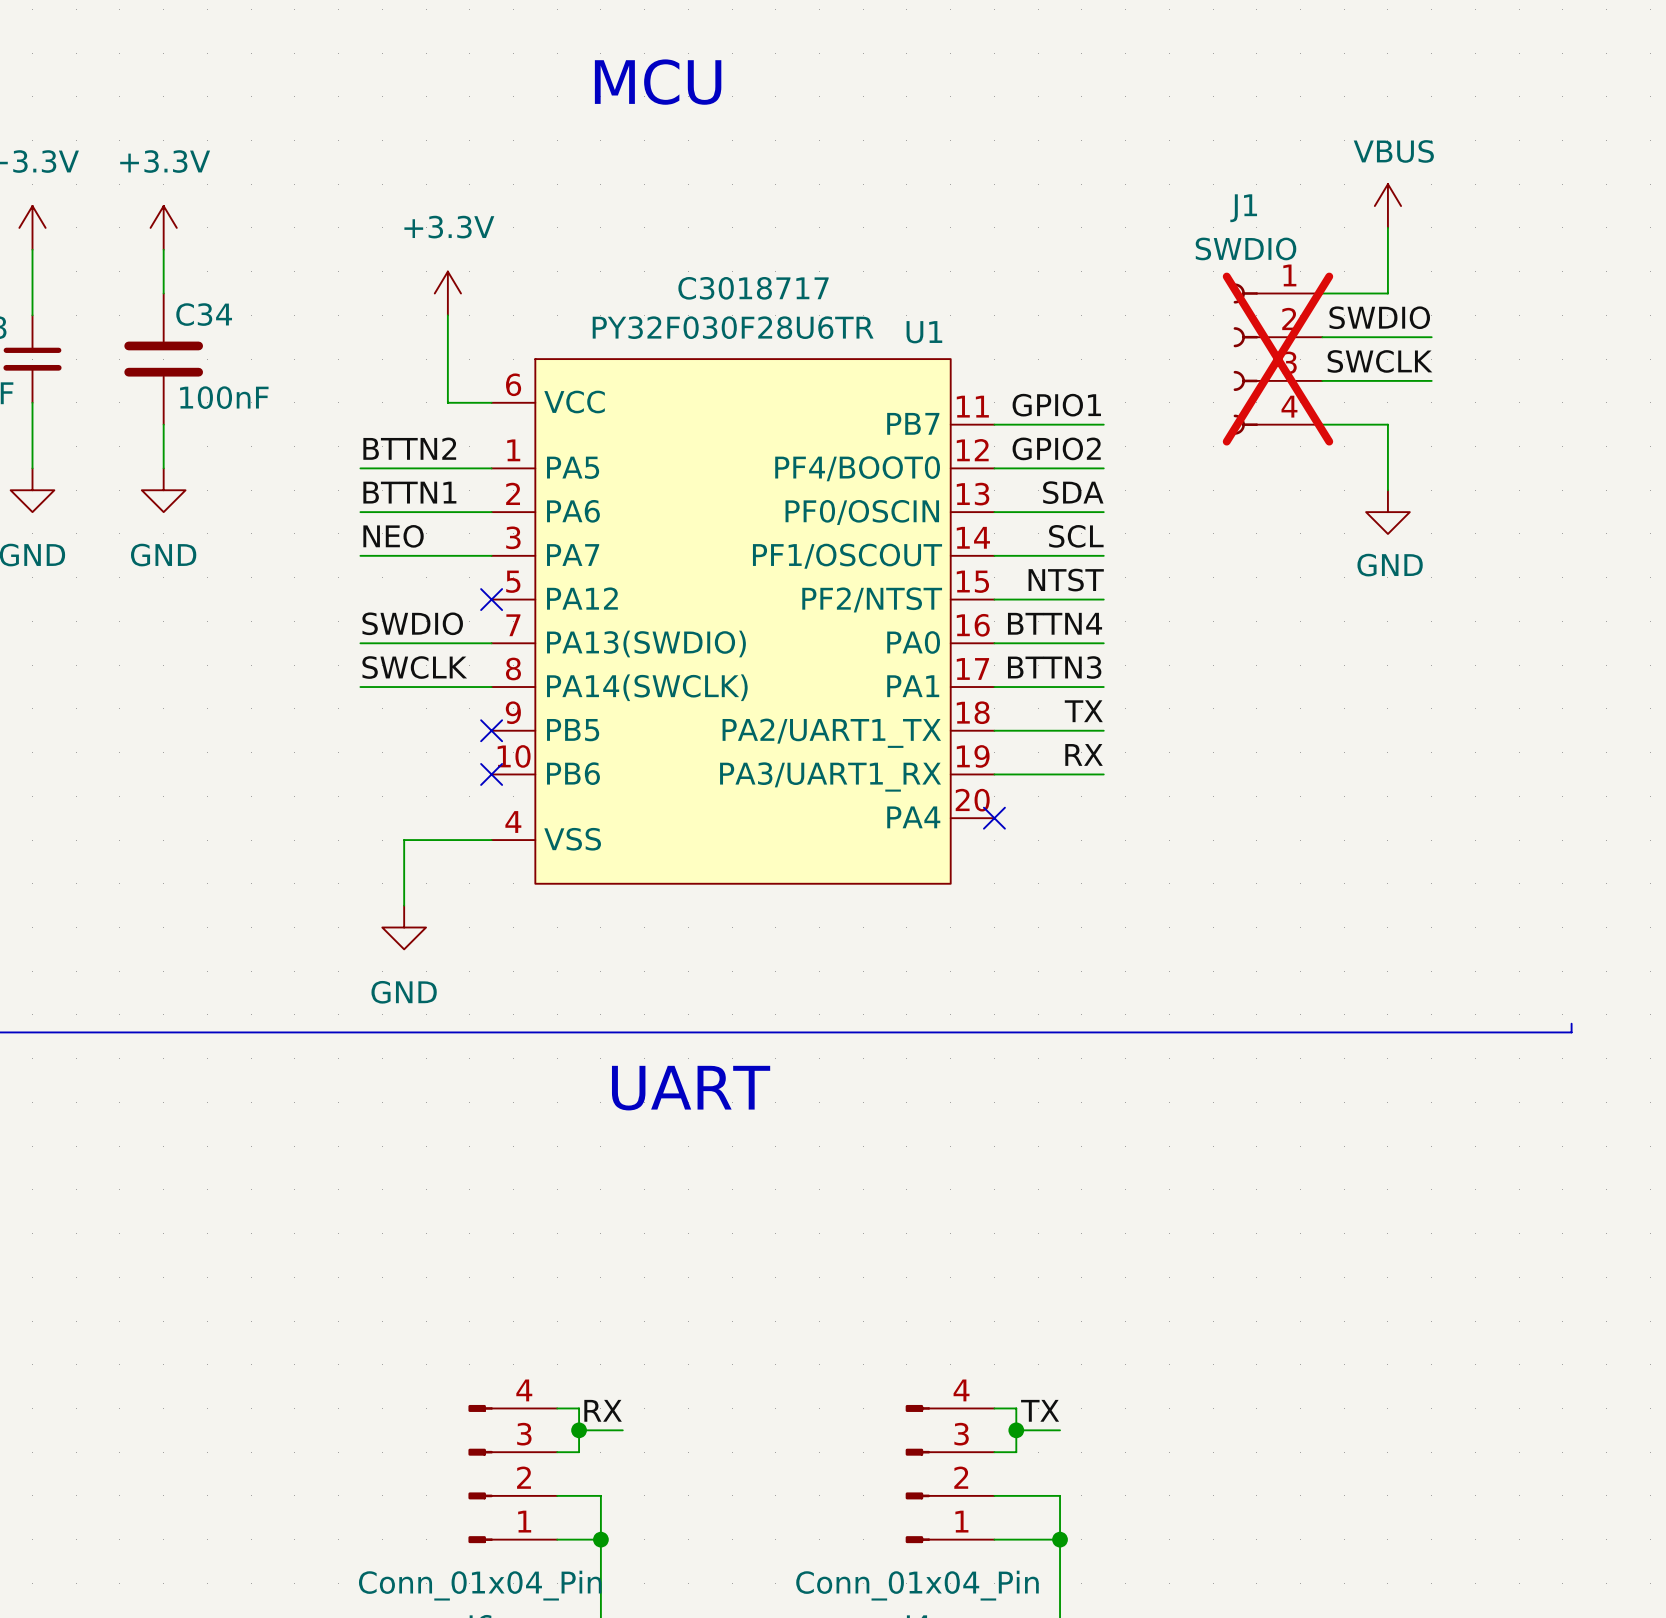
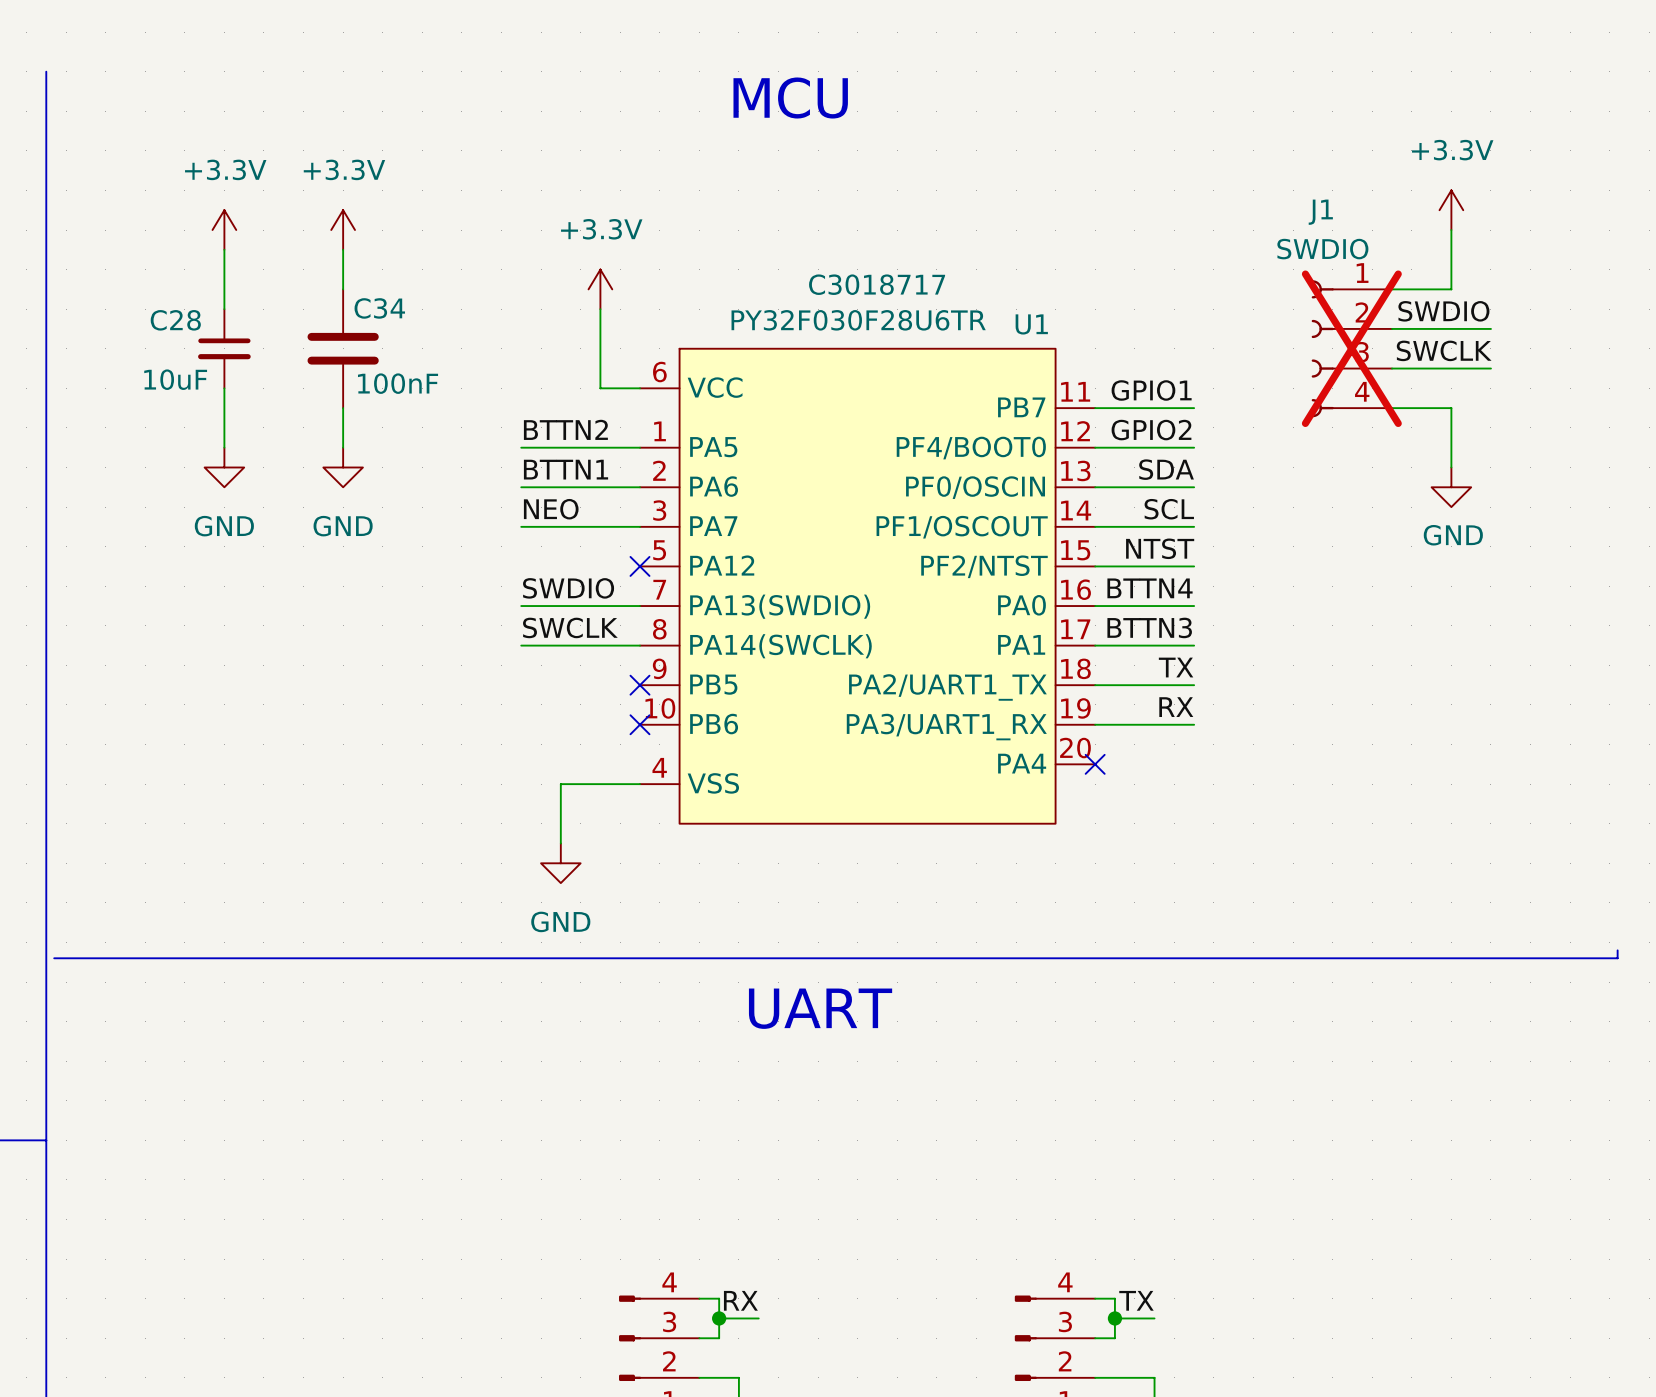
power symbol: VBUS (1387, 206) -> +3.3V (1451, 210)

